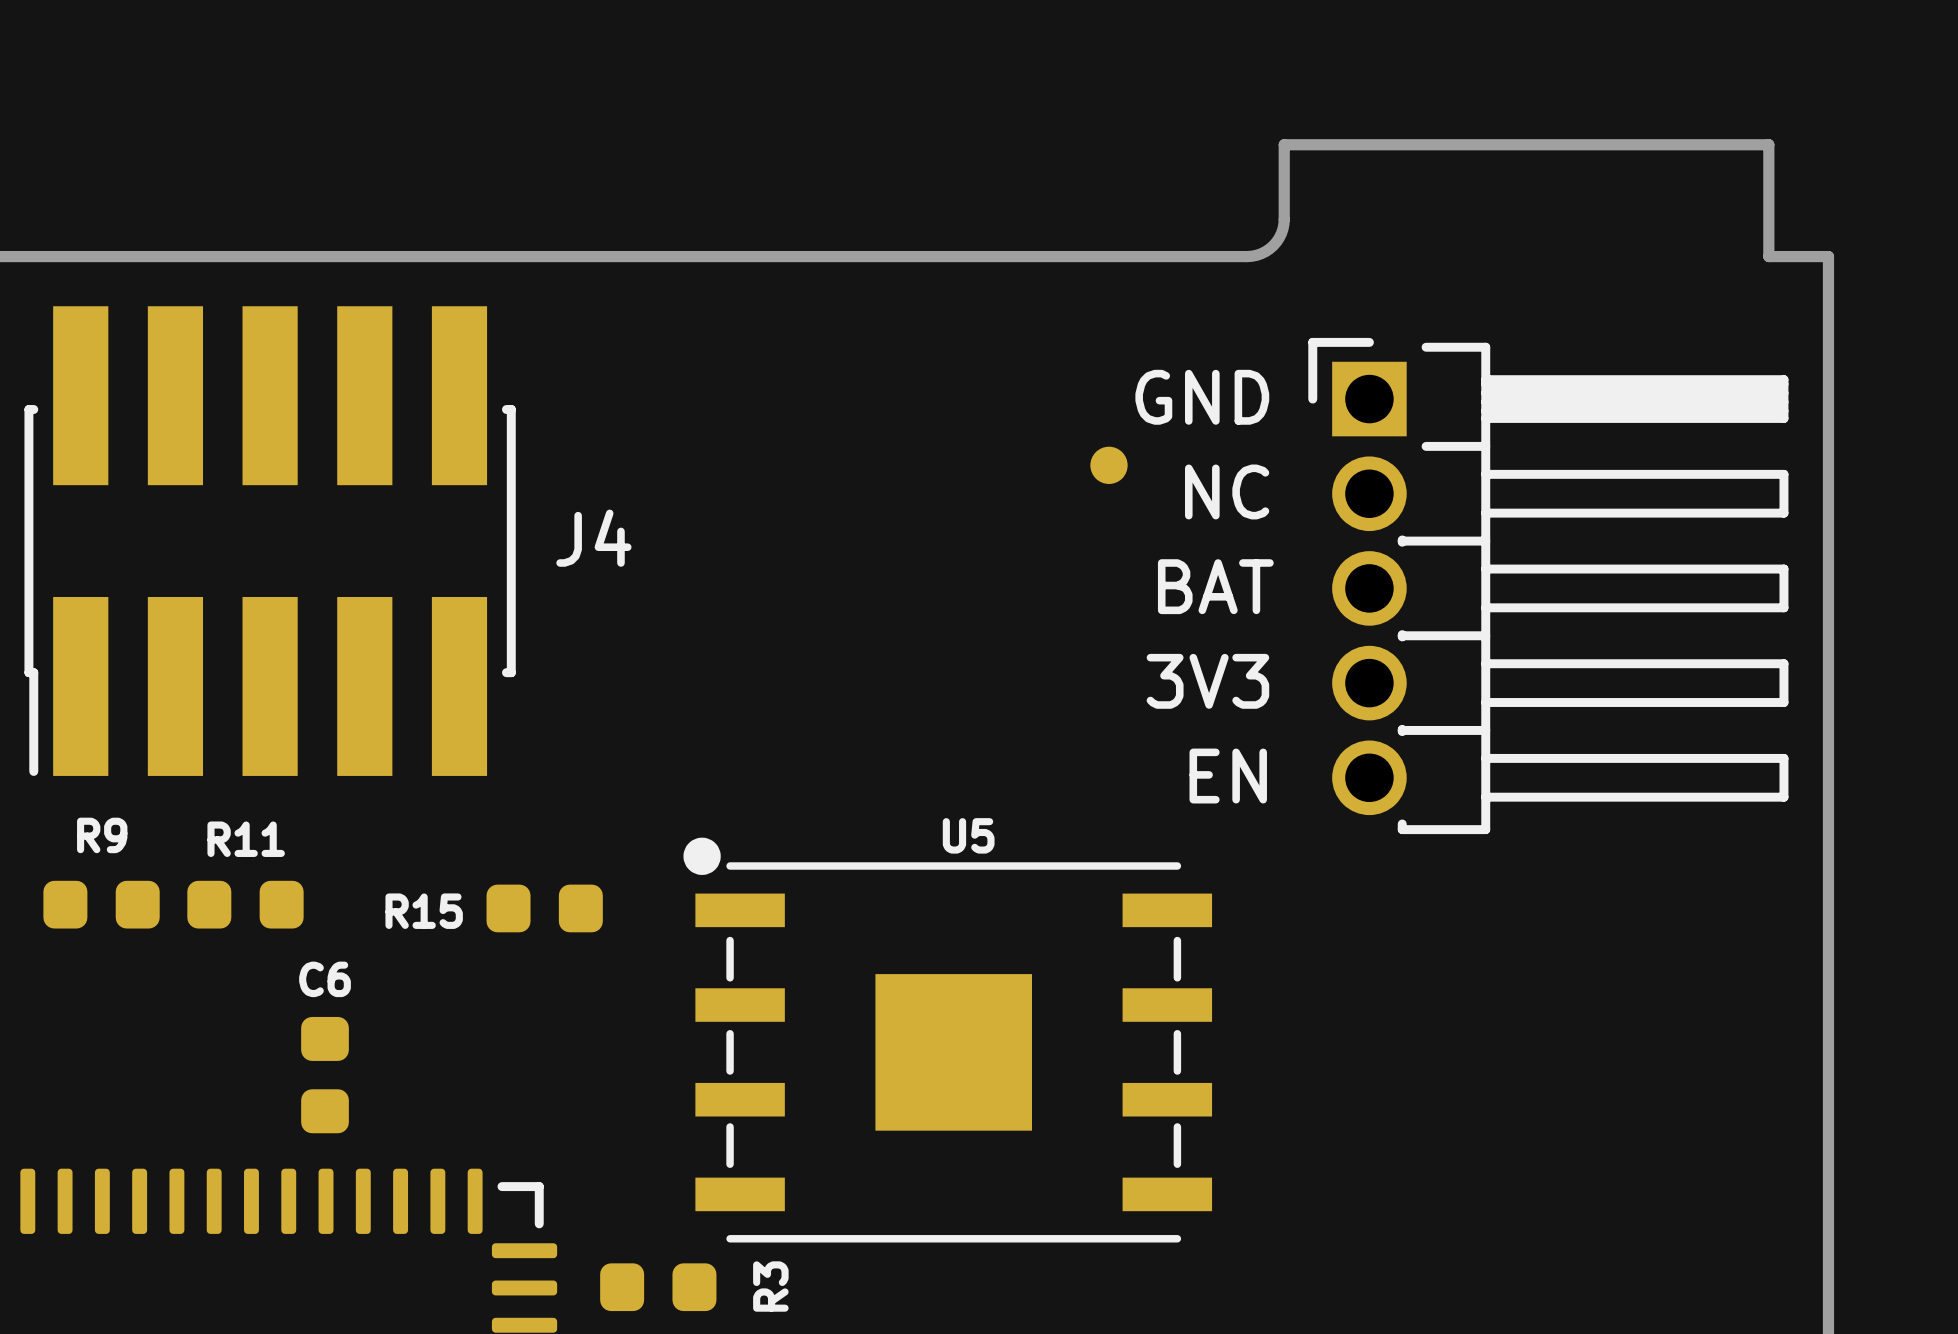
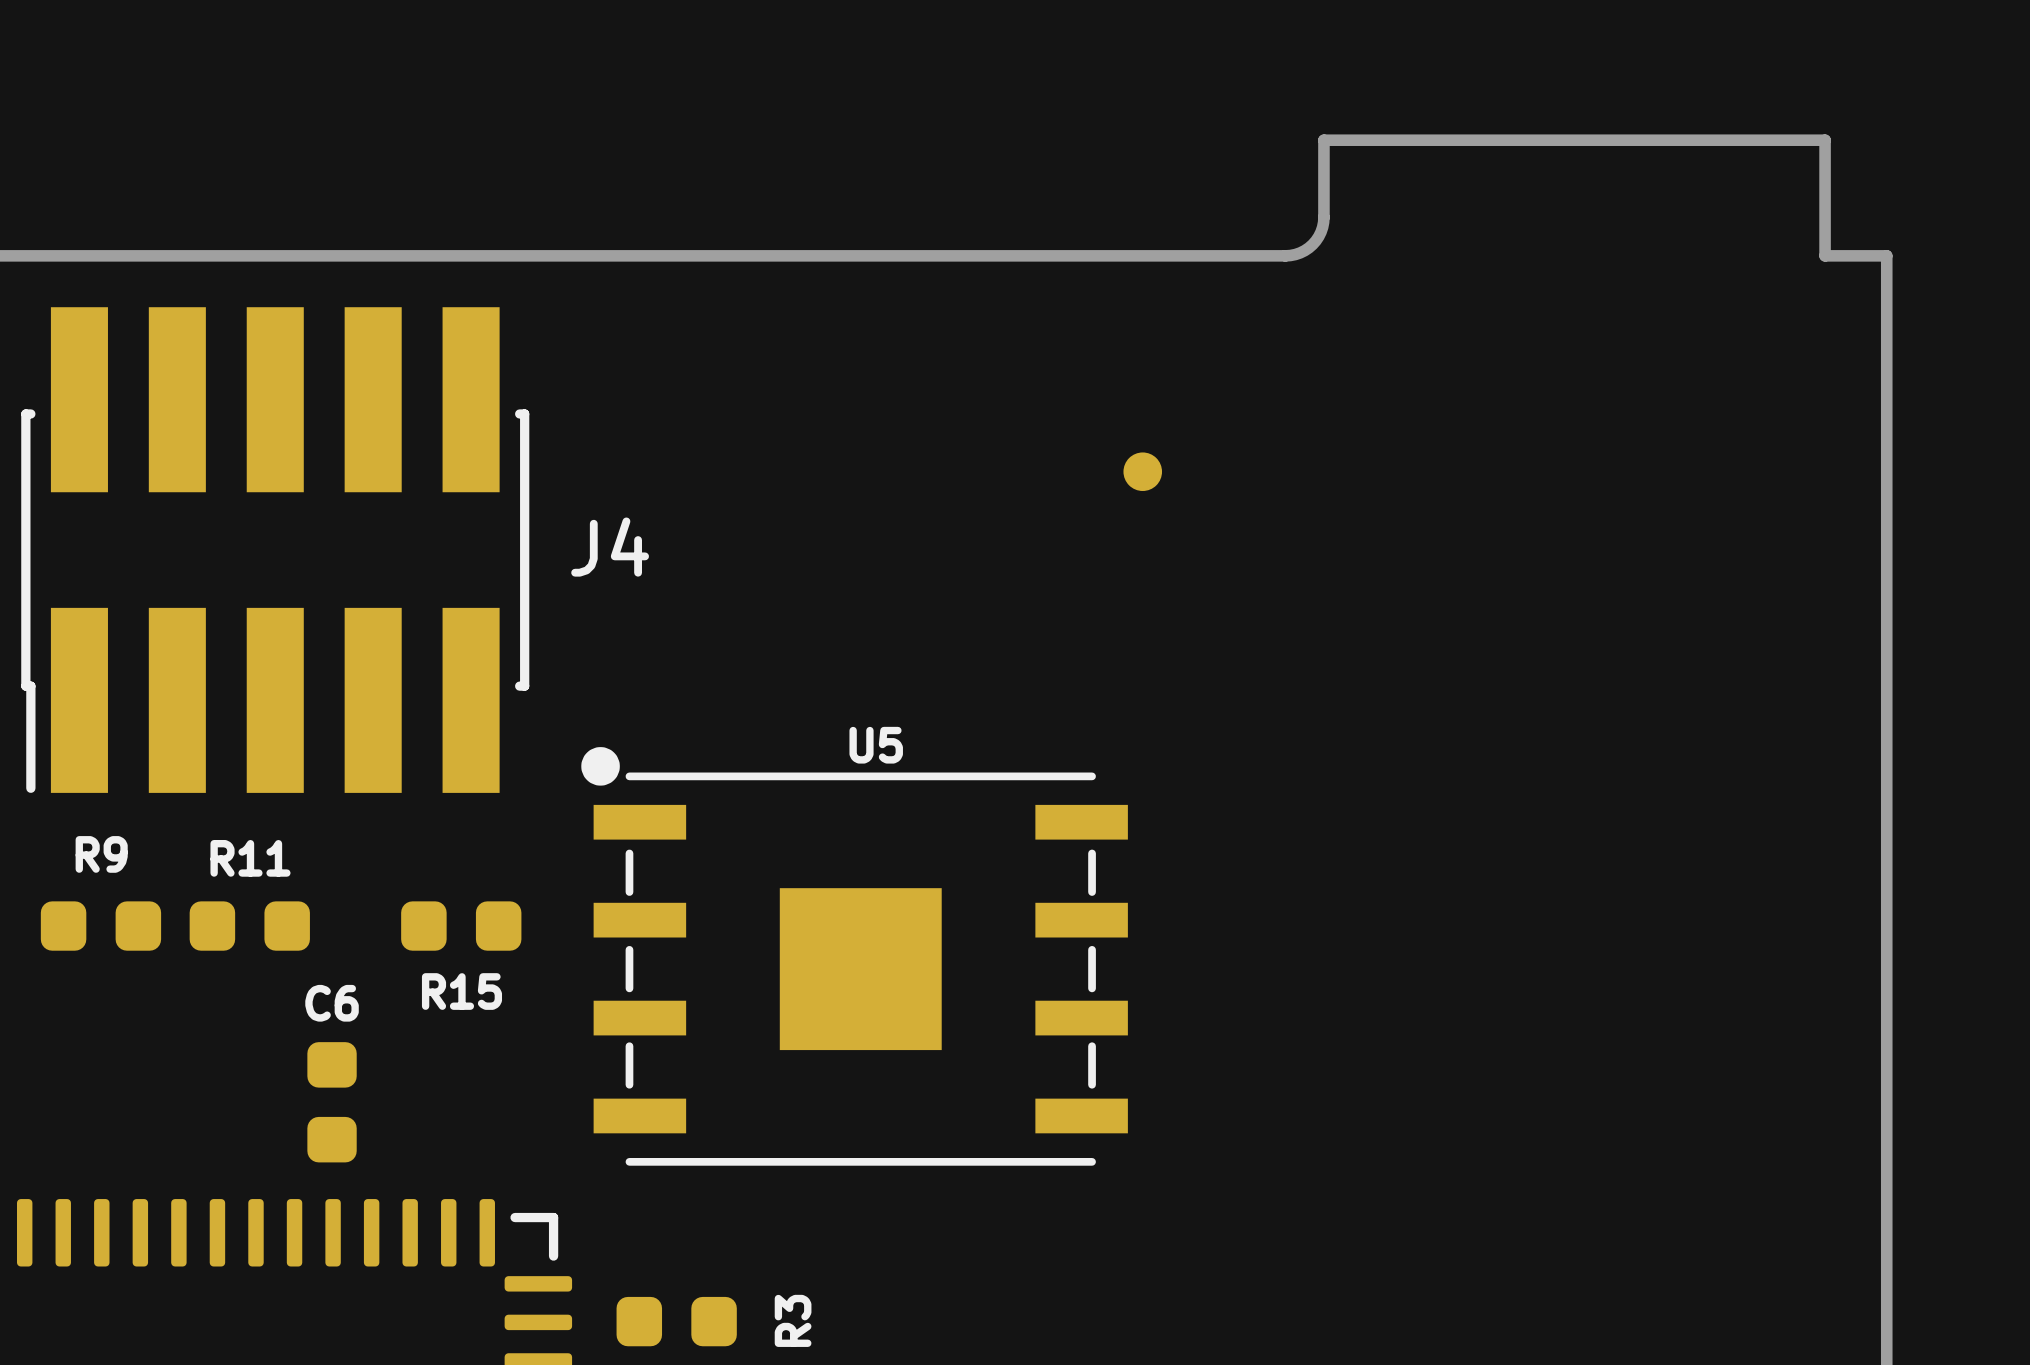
text: GND (1202, 397) -> none
text: NC (1227, 491) -> none
text: BAT (1215, 586) -> none
part: (1548, 586) -> none
text: 3V3 (1207, 681) -> none
text: EN (1228, 776) -> none
R15 position: (544, 908) -> (461, 926)
R15 name position: R15 (424, 911) -> R15 (461, 991)
U5 position: (947, 1040) -> (854, 956)

